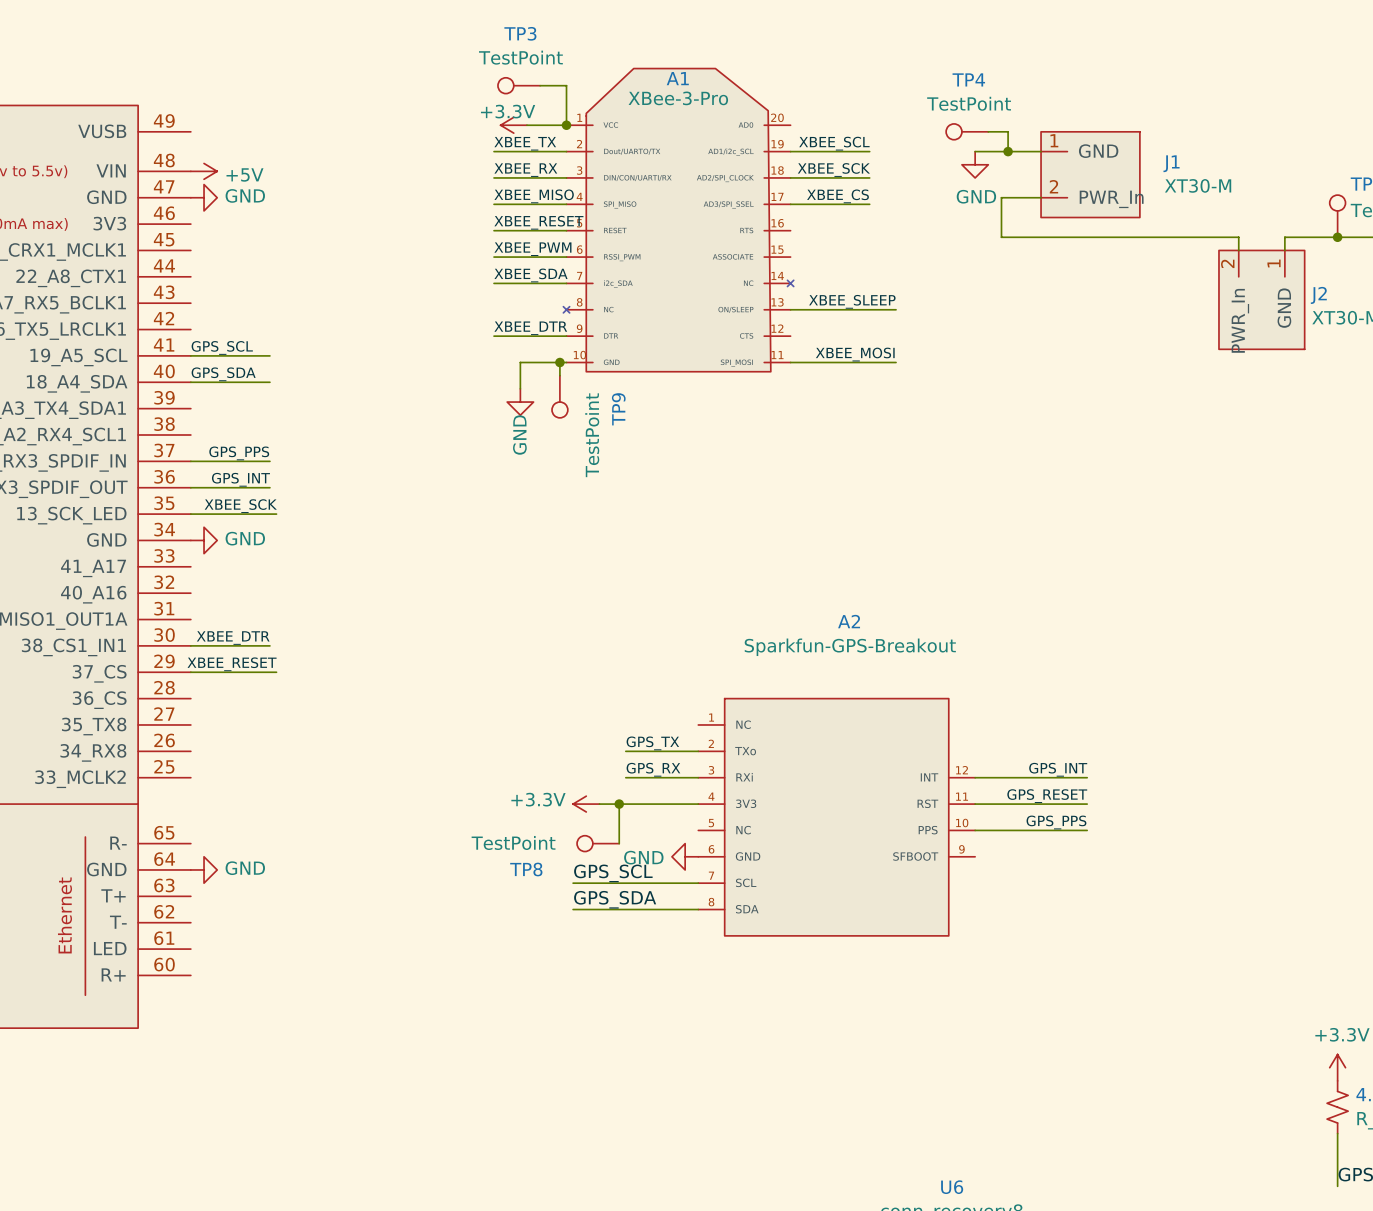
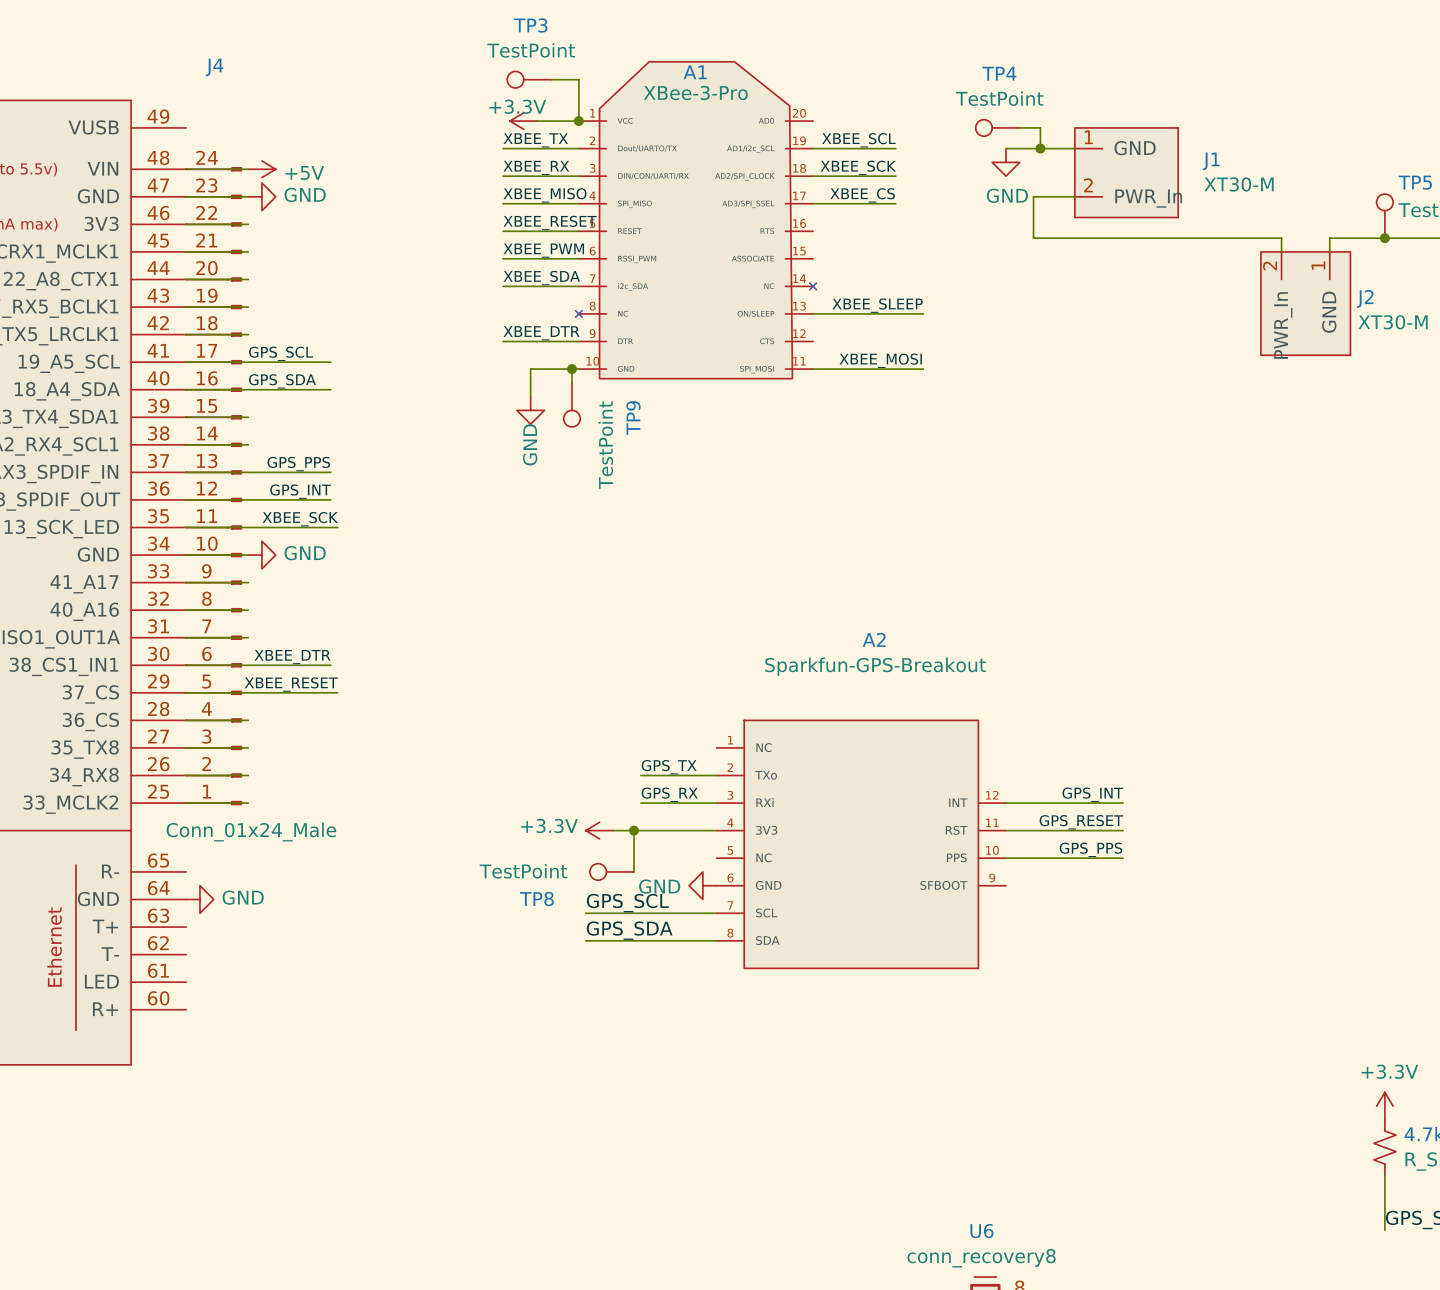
power symbol position: +5V (204, 171) -> +5V (261, 169)
wire: none -> (186, 196) (248, 196)
power symbol position: GND (204, 197) -> GND (261, 196)
wire: none -> (186, 224) (248, 224)
wire: none -> (186, 251) (248, 251)
wire: none -> (186, 279) (248, 279)
wire: none -> (186, 307) (248, 307)
wire: none -> (186, 334) (248, 334)
label position: GPS_SCL (222, 347) -> GPS_SCL (281, 353)
wire: none -> (268, 362) (330, 362)
label position: GPS_SDA (223, 374) -> GPS_SDA (282, 381)
wire: none -> (268, 389) (330, 389)
wire: none -> (186, 417) (248, 417)
wire: none -> (186, 444) (248, 444)
label position: GPS_PPS (239, 453) -> GPS_PPS (298, 464)
wire: none -> (268, 472) (330, 472)
J4: none -> Conn_01x24_Male (214, 486)
label position: GPS_INT (240, 479) -> GPS_INT (300, 491)
wire: none -> (268, 499) (330, 499)
label position: XBEE_SCK (240, 506) -> XBEE_SCK (300, 519)
wire: none -> (275, 527) (337, 527)
wire: none -> (186, 555) (248, 555)
power symbol position: GND (204, 540) -> GND (261, 555)
wire: none -> (186, 582) (248, 582)
wire: none -> (186, 610) (248, 610)
wire: none -> (186, 637) (248, 637)
label position: XBEE_DTR (233, 638) -> XBEE_DTR (292, 657)
wire: none -> (268, 665) (330, 665)
label position: XBEE_RESET (232, 664) -> XBEE_RESET (291, 684)
wire: none -> (275, 692) (337, 692)
wire: none -> (186, 720) (248, 720)
wire: none -> (186, 747) (248, 747)
wire: none -> (186, 775) (248, 775)
wire: none -> (186, 803) (248, 803)

